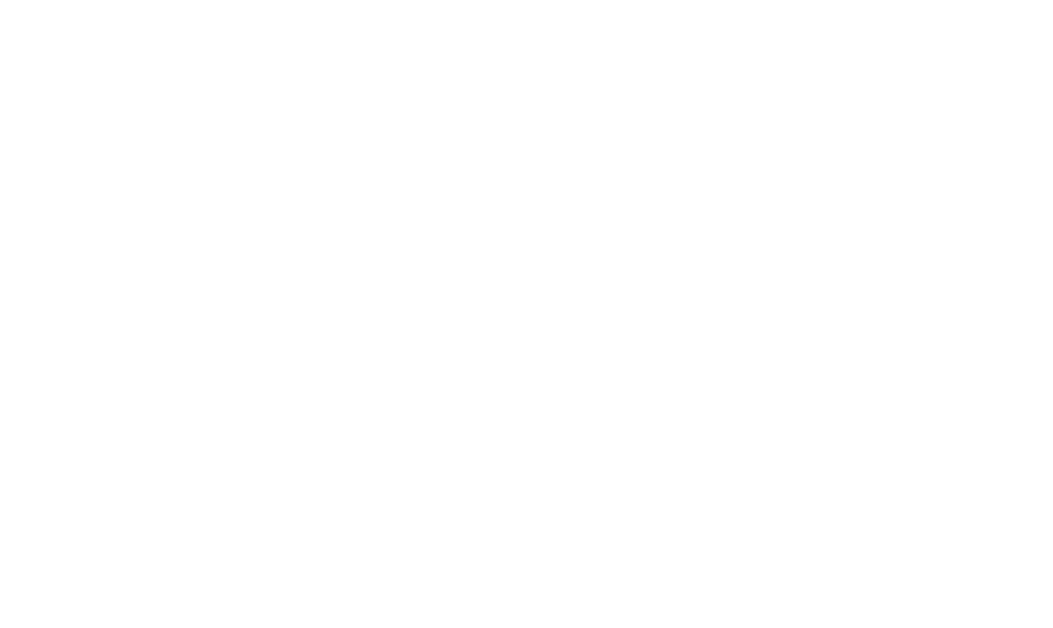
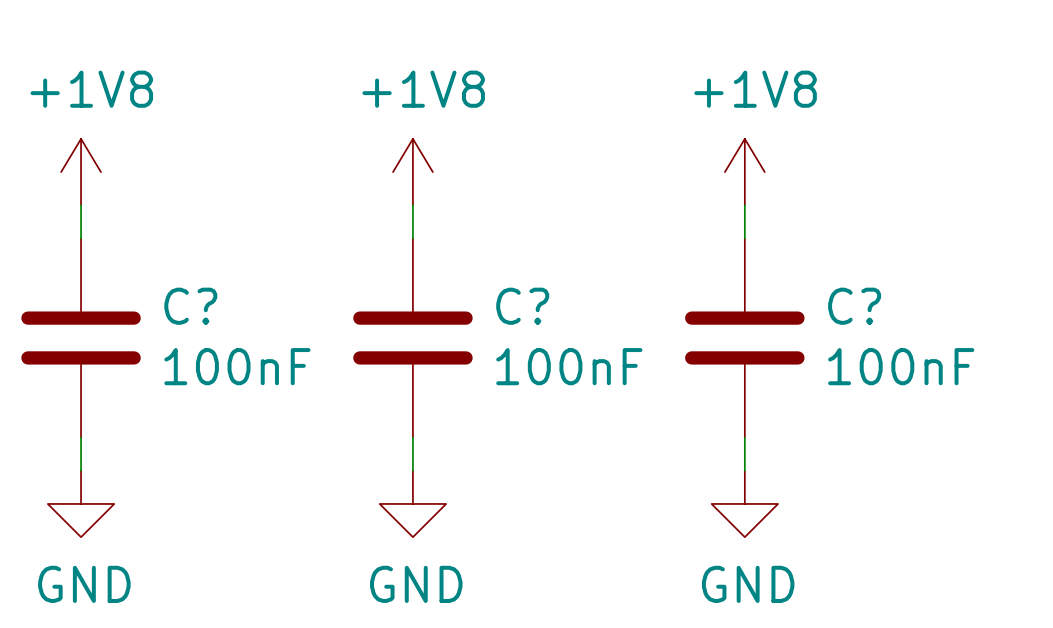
power symbol: none -> +1V8 (81, 172)
power symbol: none -> +1V8 (412, 172)
power symbol: none -> +1V8 (744, 172)
wire: none -> (81, 205) (81, 238)
wire: none -> (412, 205) (412, 238)
wire: none -> (744, 205) (744, 238)
C?: none -> 100nF (81, 338)
C?: none -> 100nF (412, 338)
C?: none -> 100nF (744, 338)
wire: none -> (81, 437) (81, 470)
wire: none -> (412, 437) (412, 470)
wire: none -> (744, 437) (744, 470)
power symbol: none -> GND (81, 503)
power symbol: none -> GND (412, 503)
power symbol: none -> GND (744, 503)

